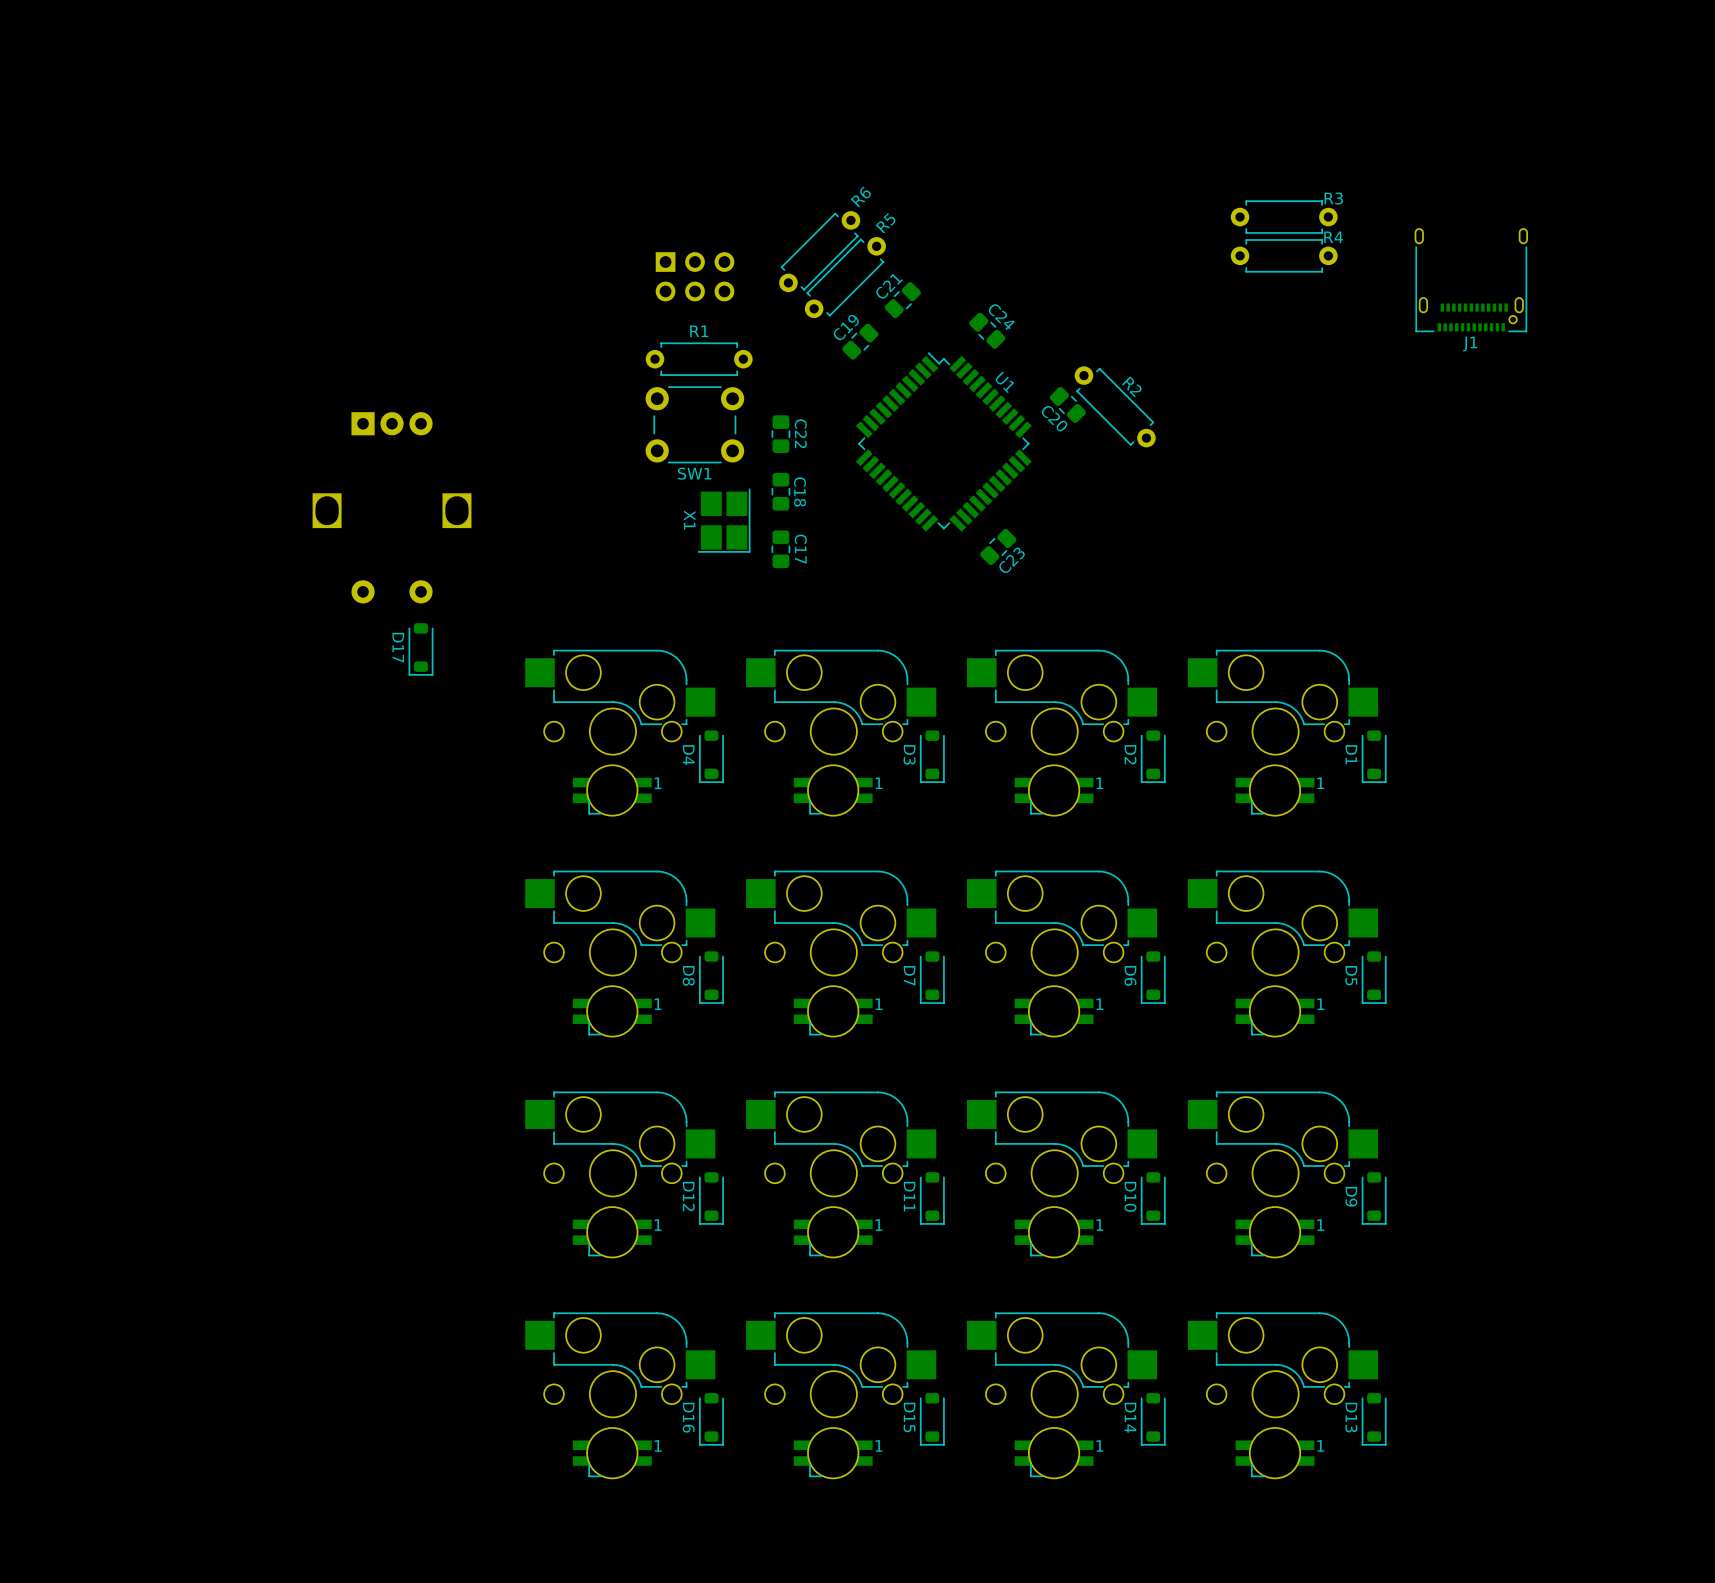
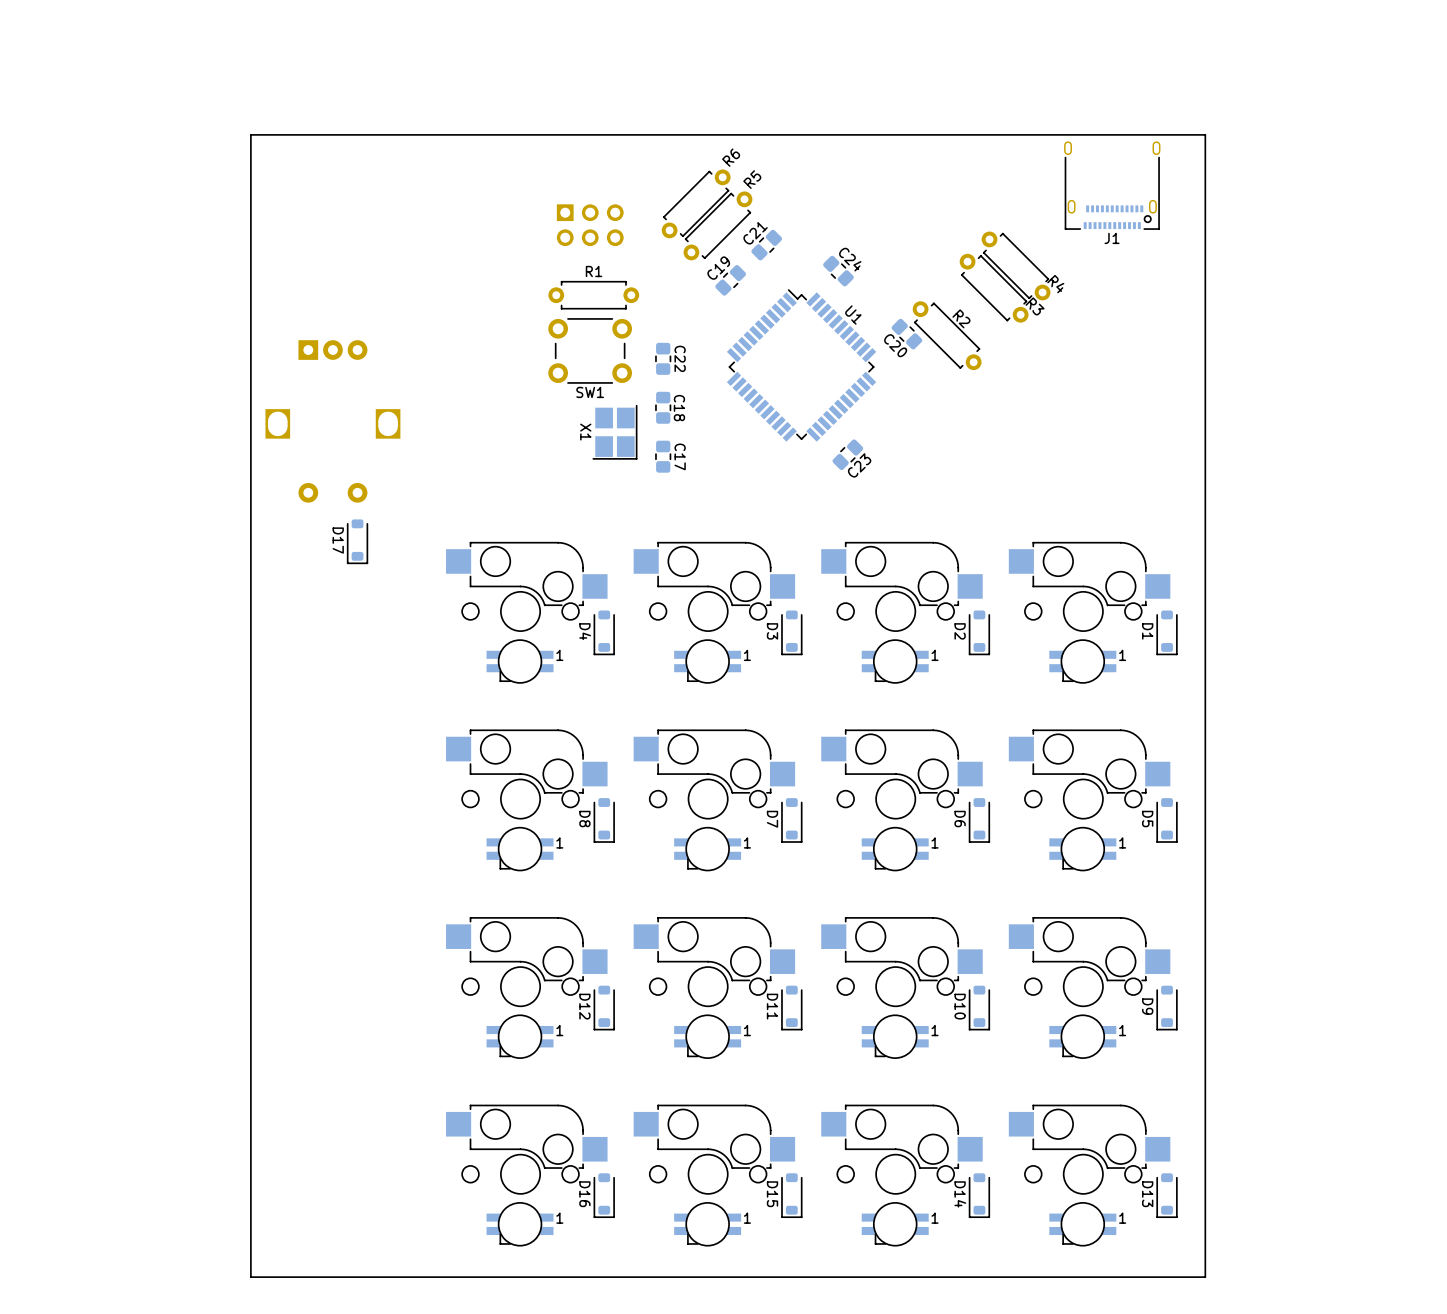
board edge: none -> (1205, 134) (250, 134) (250, 1277) (1205, 1277) (1205, 134)
R3 rotation: 0° (1284, 217) -> 45° clockwise (994, 288)
R3 position: (1284, 217) -> (994, 288)
R4 rotation: 0° (1284, 255) -> 45° clockwise (1016, 265)
R4 position: (1284, 255) -> (1016, 265)
J1 position: (1471, 280) -> (1112, 185)

